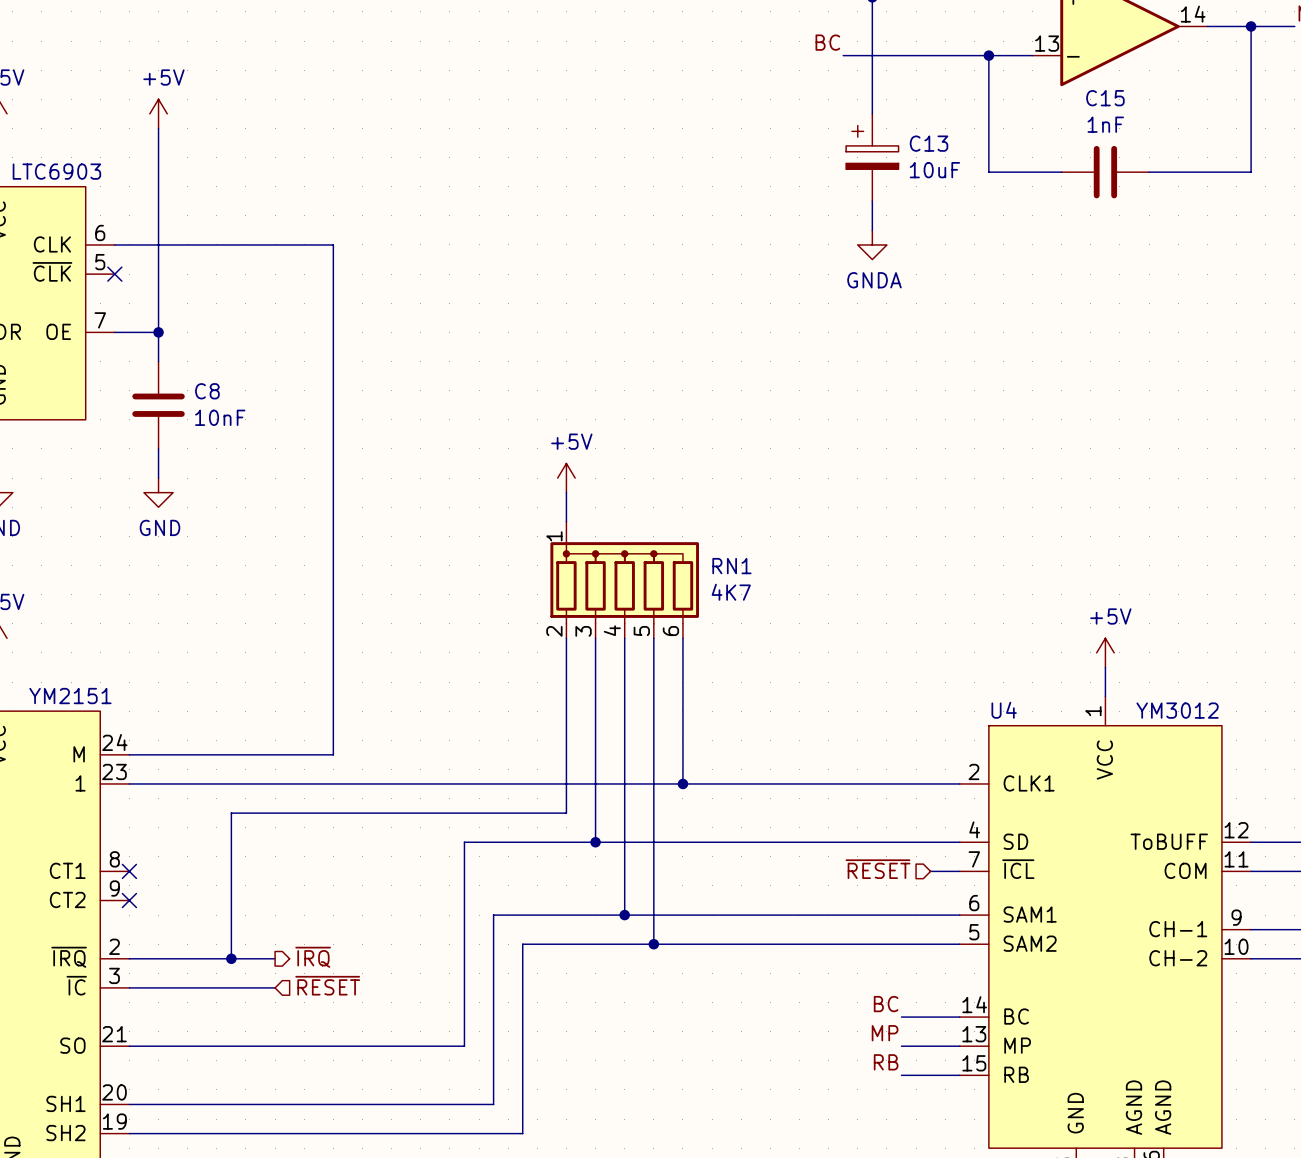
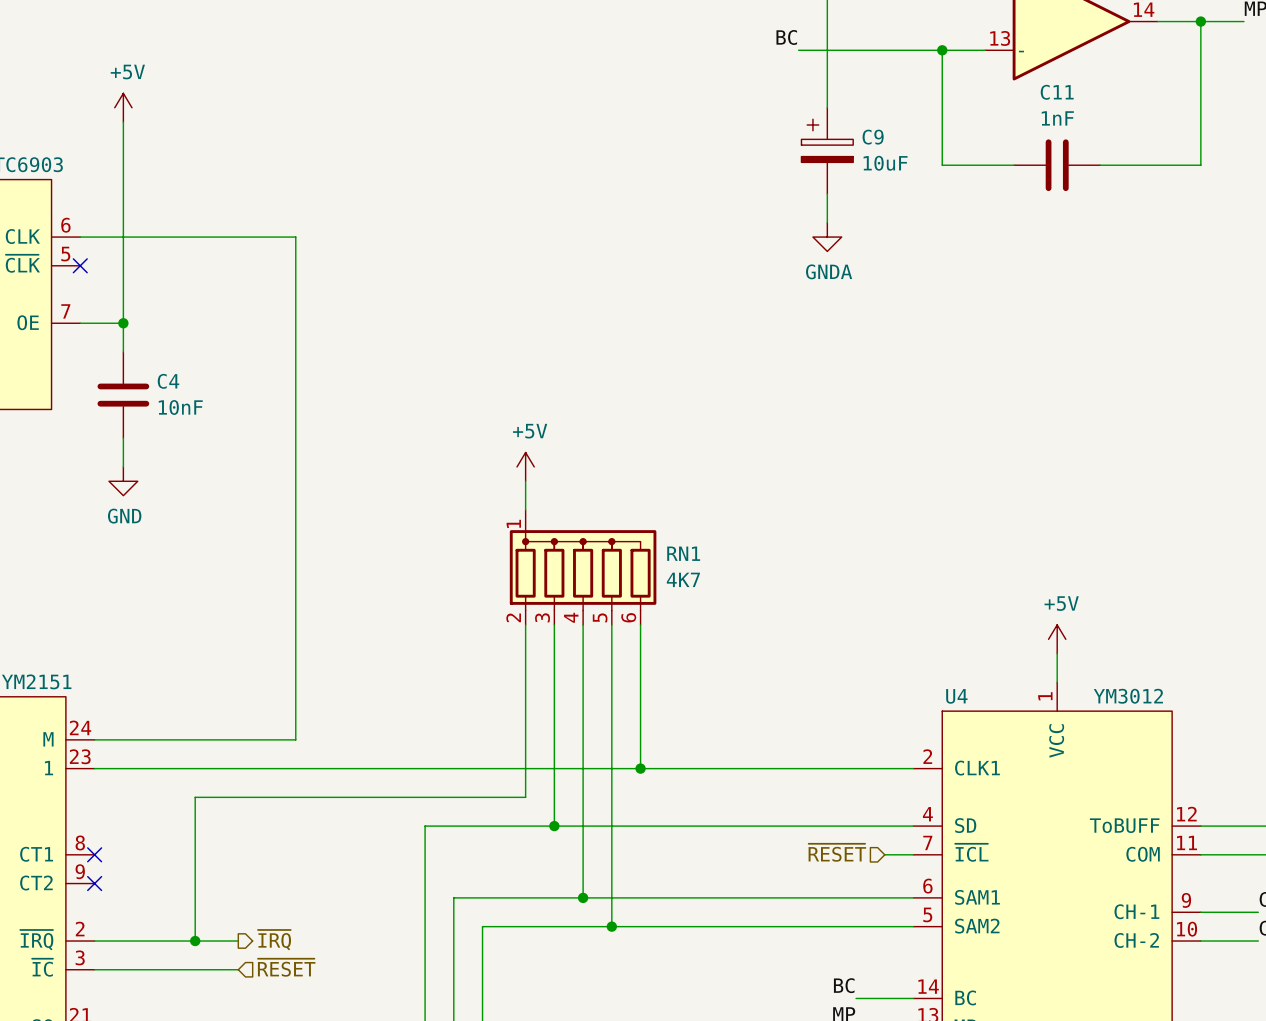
C15 name: C15 (1105, 98) -> C11 (1057, 92)
C13 name: C13 (929, 143) -> C9 (873, 137)
C8 name: C8 (207, 391) -> C4 (168, 381)

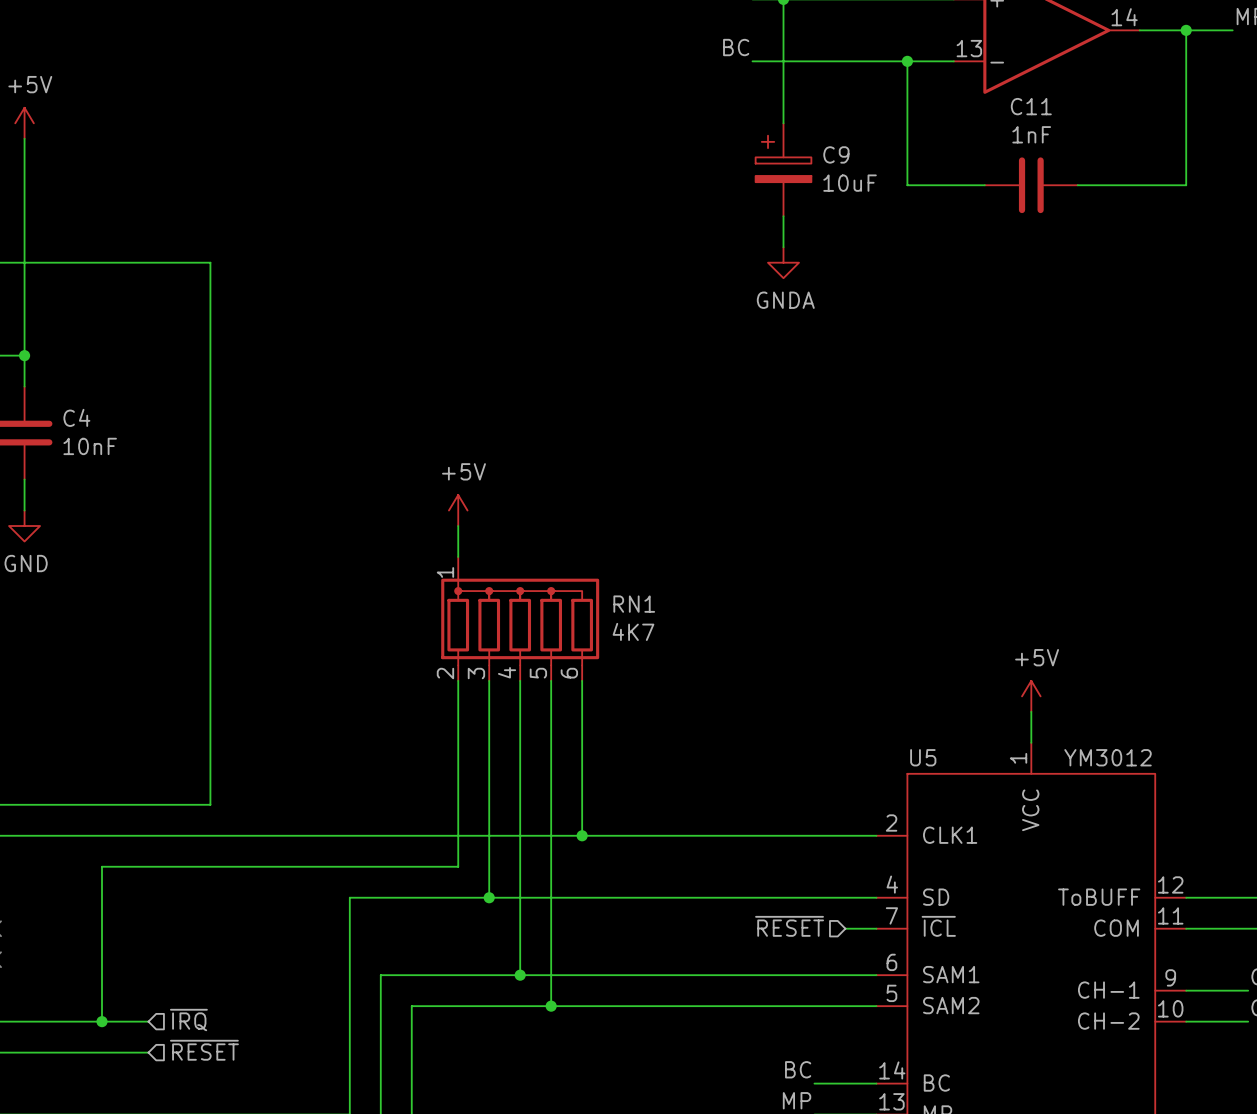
U4 name: U4 (956, 696) -> U5 (923, 757)
hierarchical label shape: output (274, 940) -> input (188, 1020)

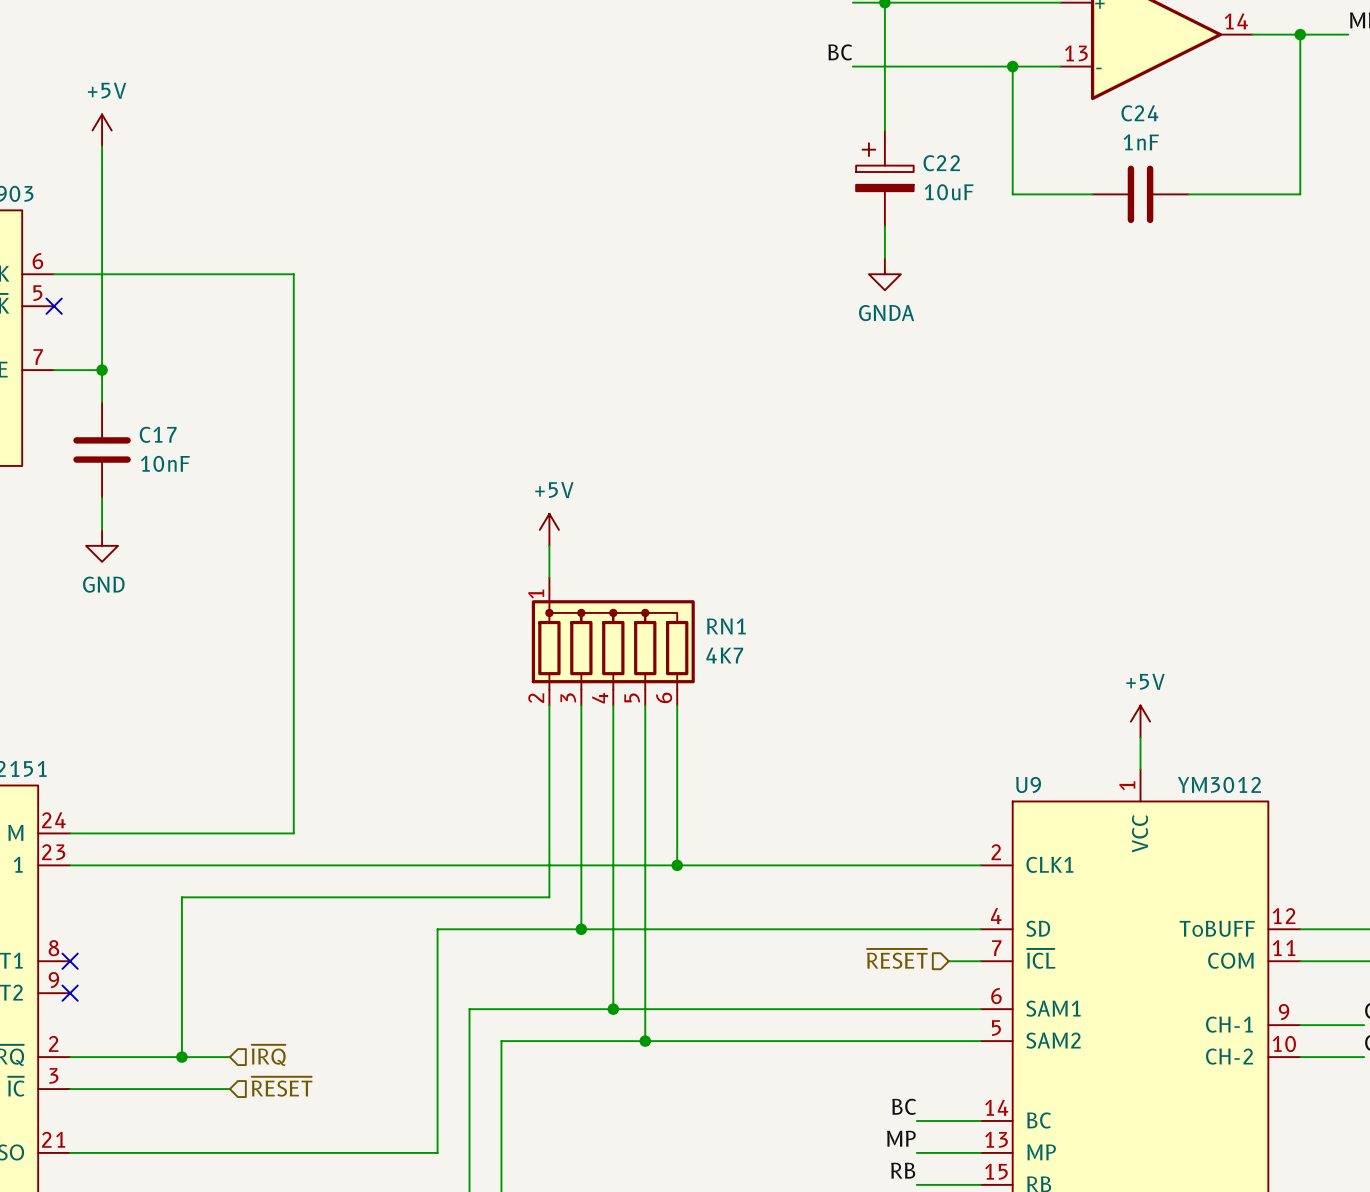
C11 name: C11 (1031, 106) -> C24 (1139, 113)
C9 name: C9 (836, 154) -> C22 (941, 163)
C4 name: C4 (76, 417) -> C17 (158, 434)
U5 name: U5 (923, 757) -> U9 (1028, 784)

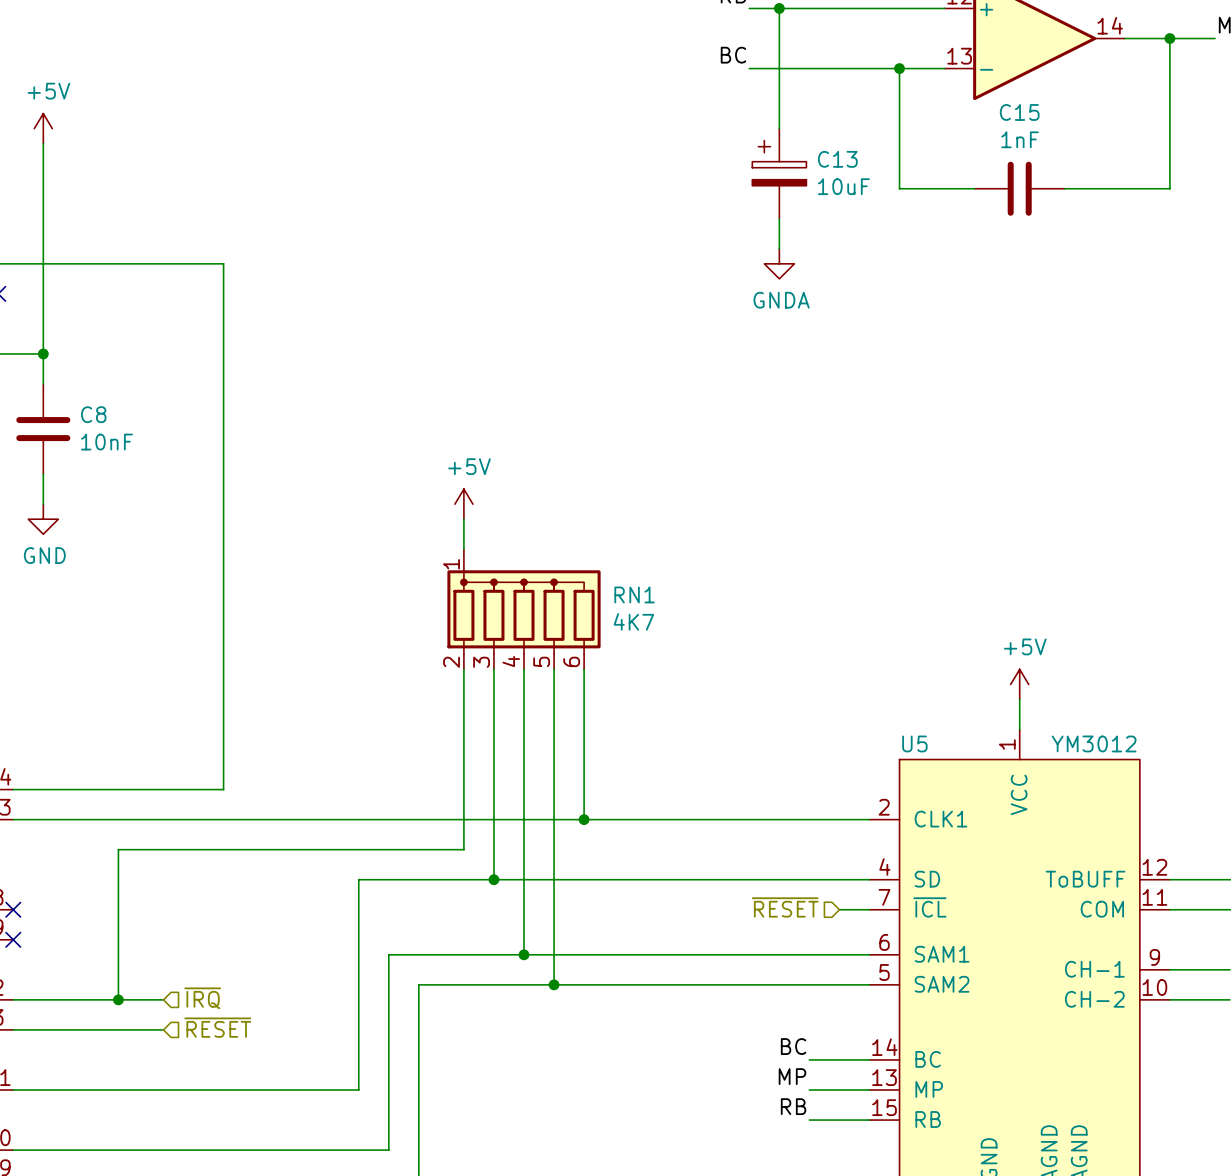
C24 name: C24 (1139, 113) -> C15 (1019, 112)
C22 name: C22 (941, 163) -> C13 (837, 159)
C17 name: C17 (158, 434) -> C8 (93, 414)
U9 name: U9 (1028, 784) -> U5 (914, 743)

